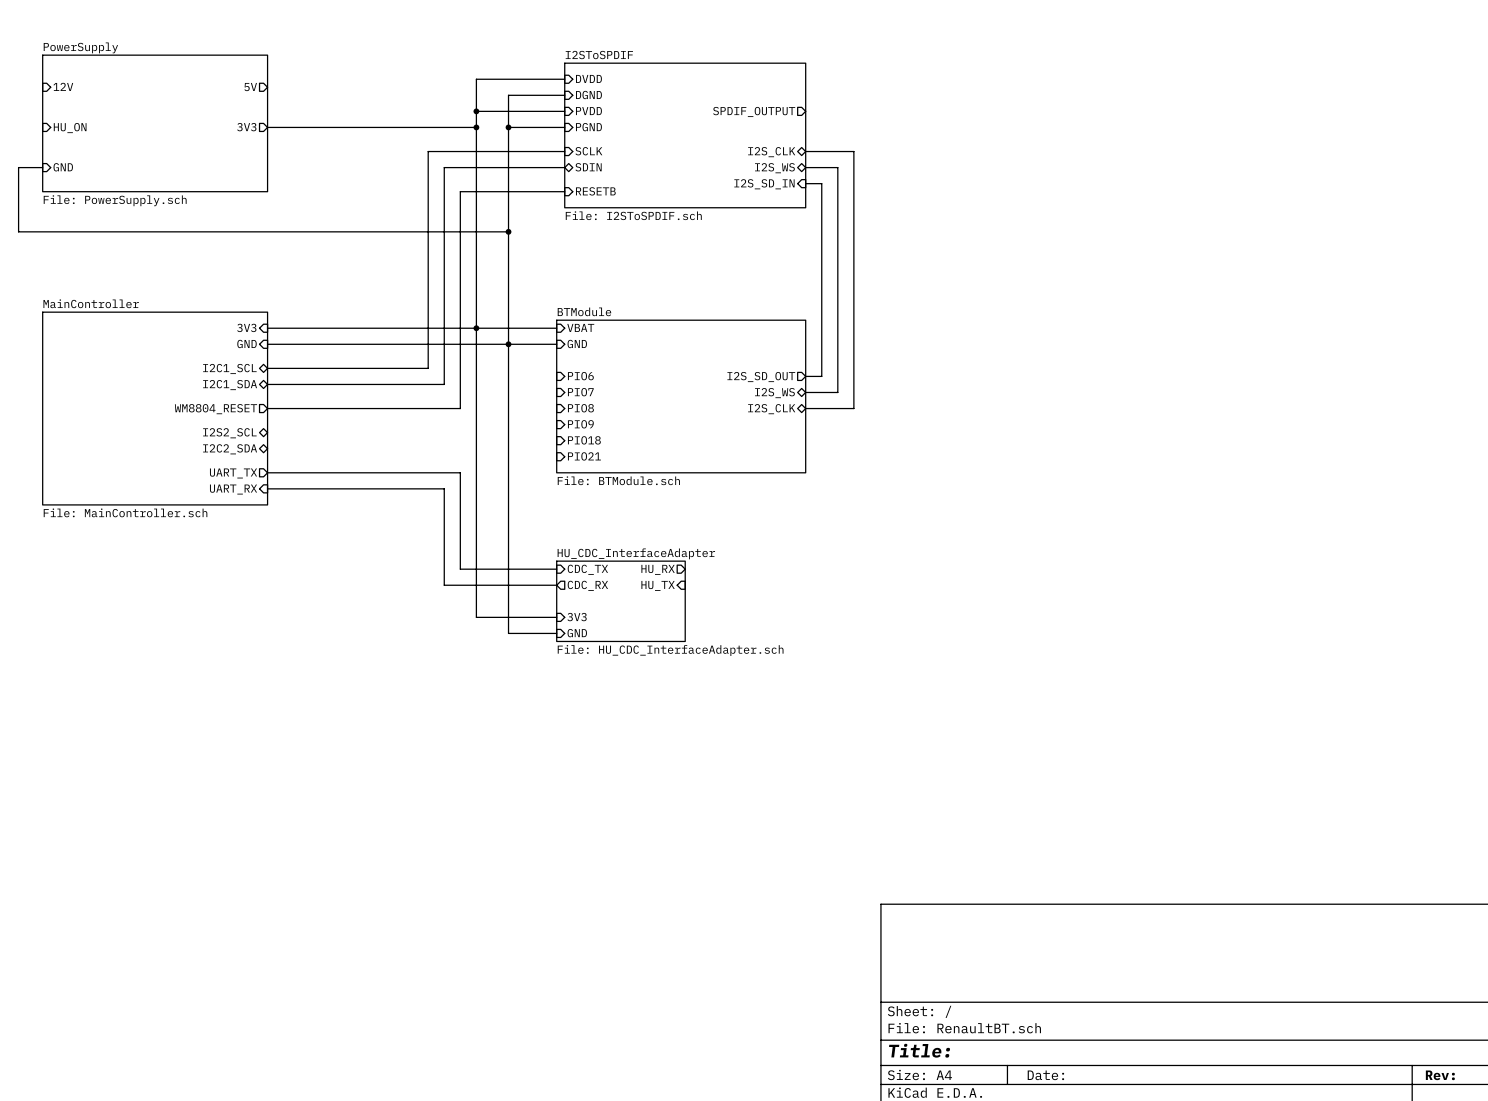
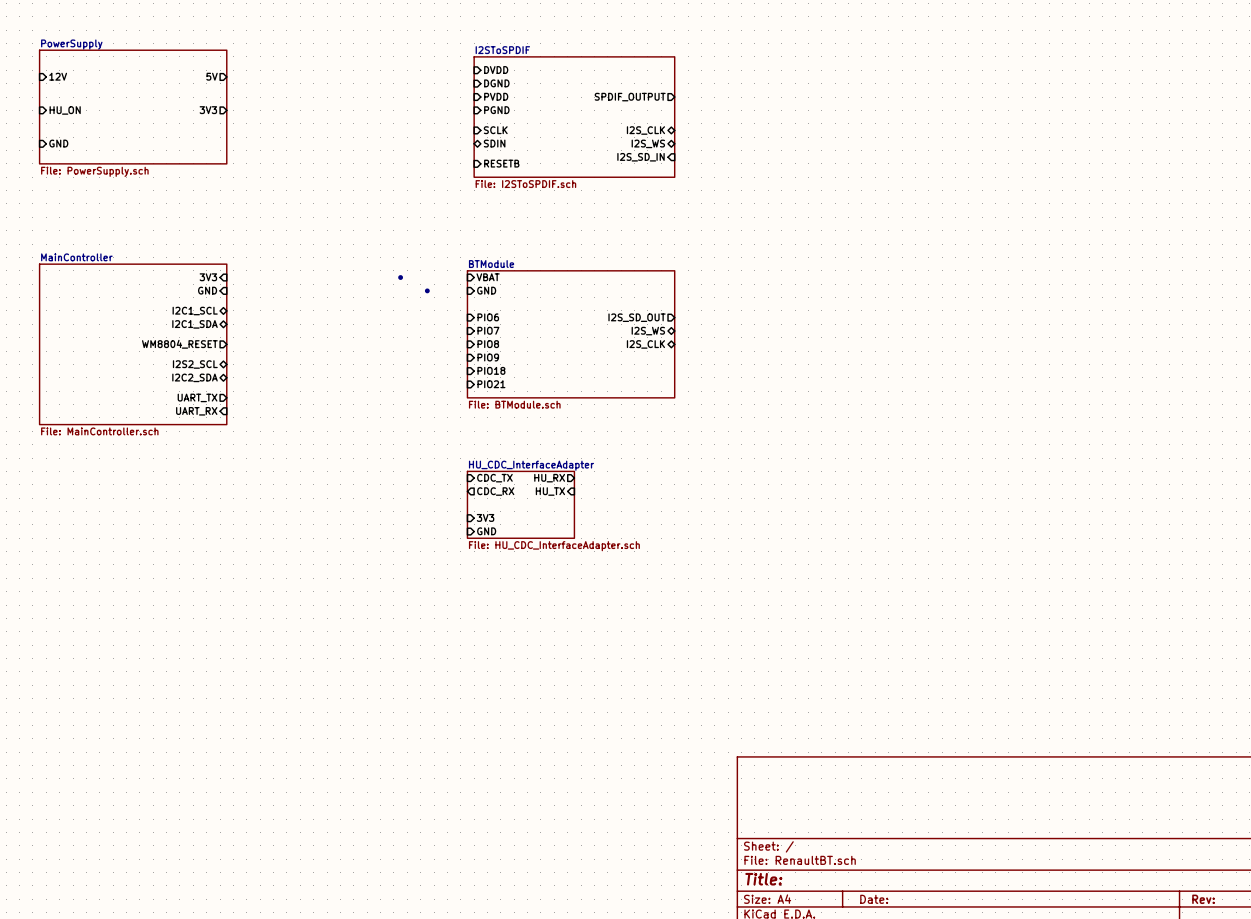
wire: (564, 79) (476, 79) (476, 617) (556, 617) -> none
wire: (564, 95) (508, 95) (508, 633) (556, 633) -> none
wire: (476, 111) (564, 111) -> none
junction: (476, 111) -> none
wire: (267, 127) (476, 127) -> none
junction: (476, 127) -> none
wire: (508, 127) (564, 127) -> none
junction: (508, 127) -> none
wire: (564, 151) (428, 151) (428, 368) (267, 368) -> none
wire: (805, 151) (853, 151) (853, 408) (805, 408) -> none
wire: (42, 167) (18, 167) (18, 231) (508, 231) -> none
wire: (564, 167) (444, 167) (444, 384) (267, 384) -> none
wire: (805, 167) (837, 167) (837, 392) (805, 392) -> none
wire: (805, 183) (821, 183) (821, 376) (805, 376) -> none
wire: (564, 191) (460, 191) (460, 408) (267, 408) -> none
junction: (508, 231) -> none
wire: (267, 328) (556, 328) -> none
wire: (267, 344) (556, 344) -> none
wire: (267, 472) (460, 472) (460, 569) (556, 569) -> none
wire: (267, 488) (444, 488) (444, 585) (556, 585) -> none

